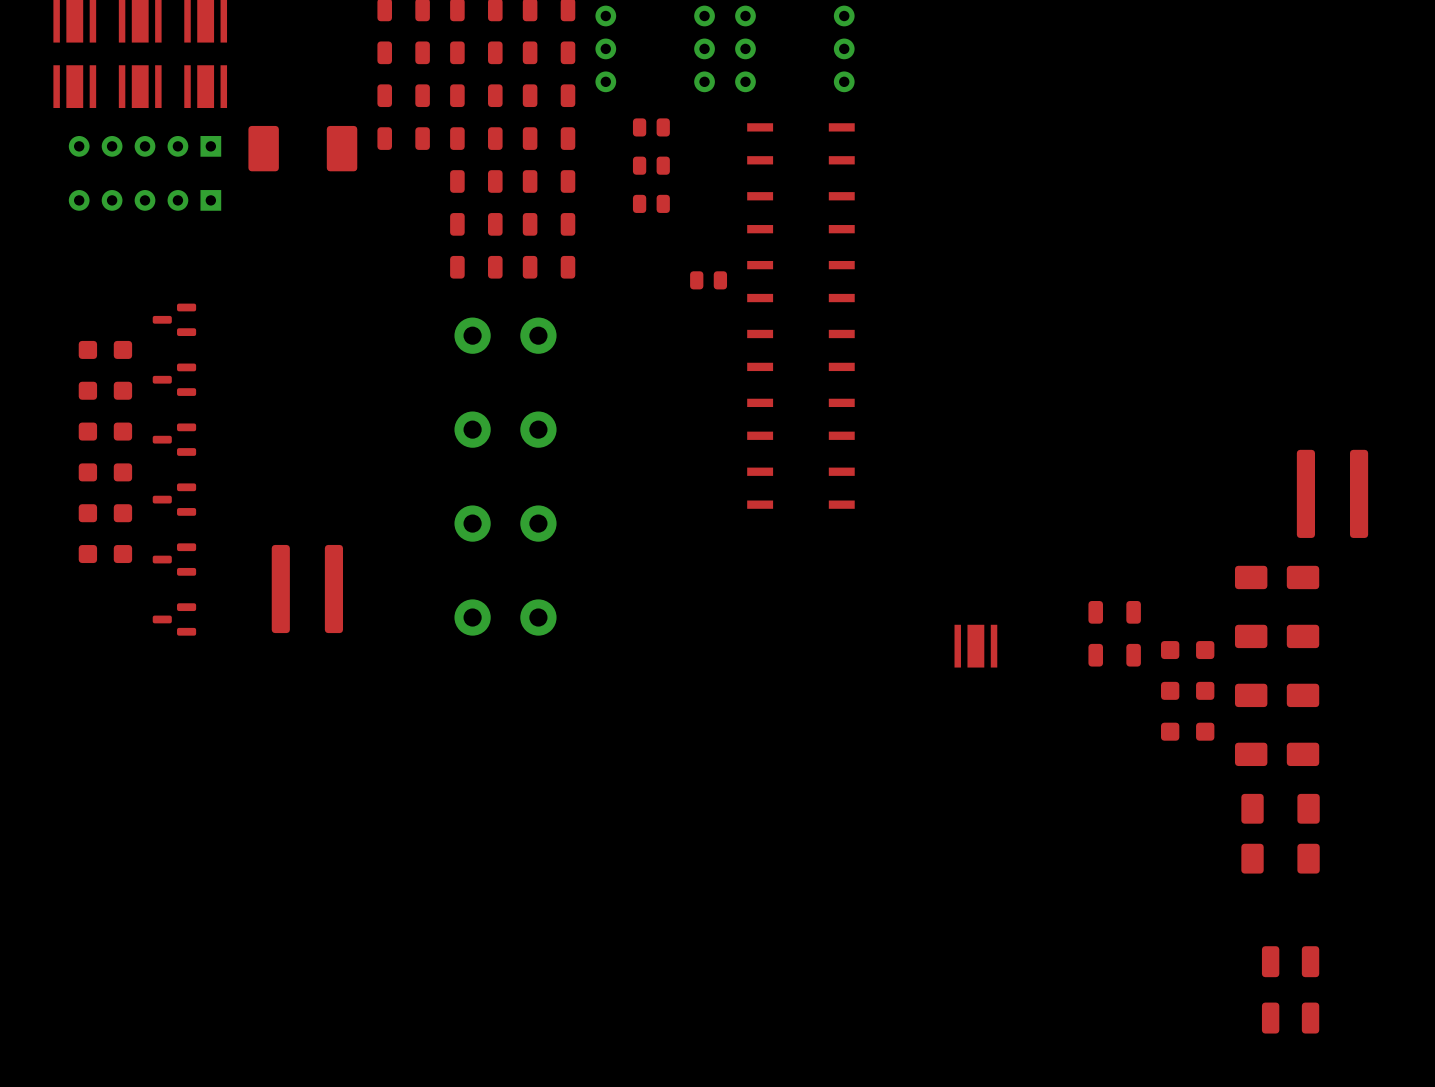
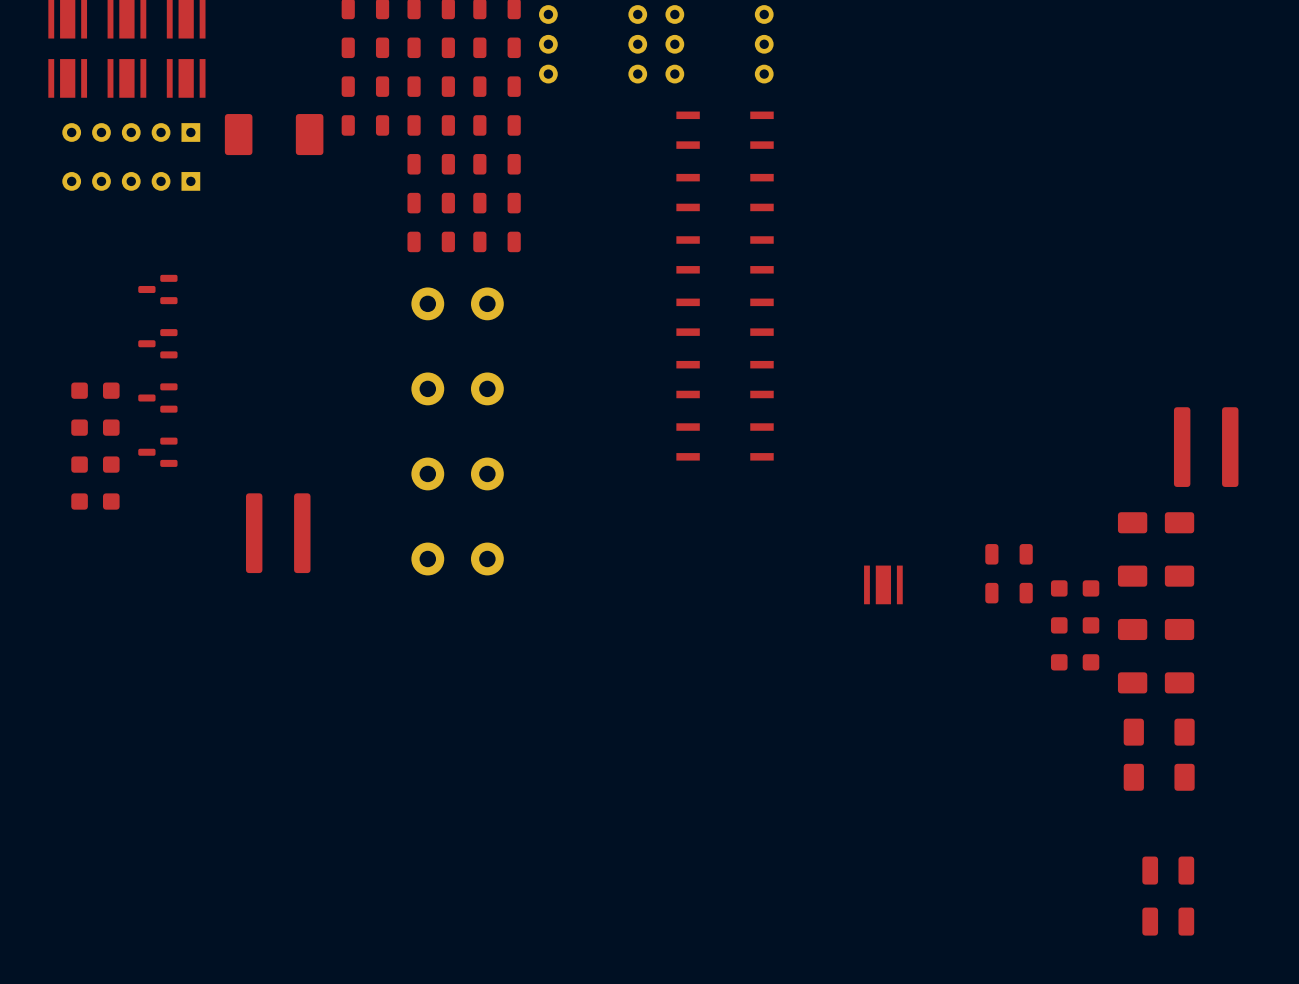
part: (651, 127) -> none
part: (651, 165) -> none
part: (651, 203) -> none
part: (708, 280) -> none
part: (105, 349) -> none
part: (105, 390) -> none
part: (174, 559) -> none
part: (174, 619) -> none

